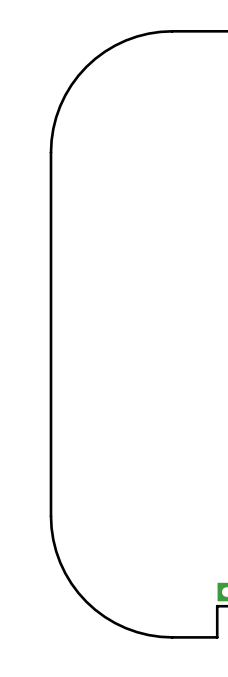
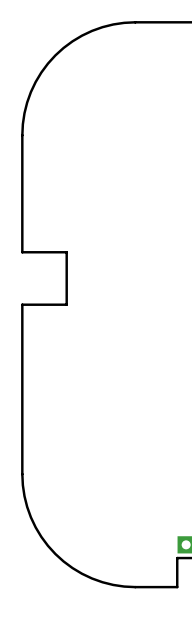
board edge: (50, 278) (50, 334) -> (22, 252) (66, 252) (66, 304) (22, 304)

